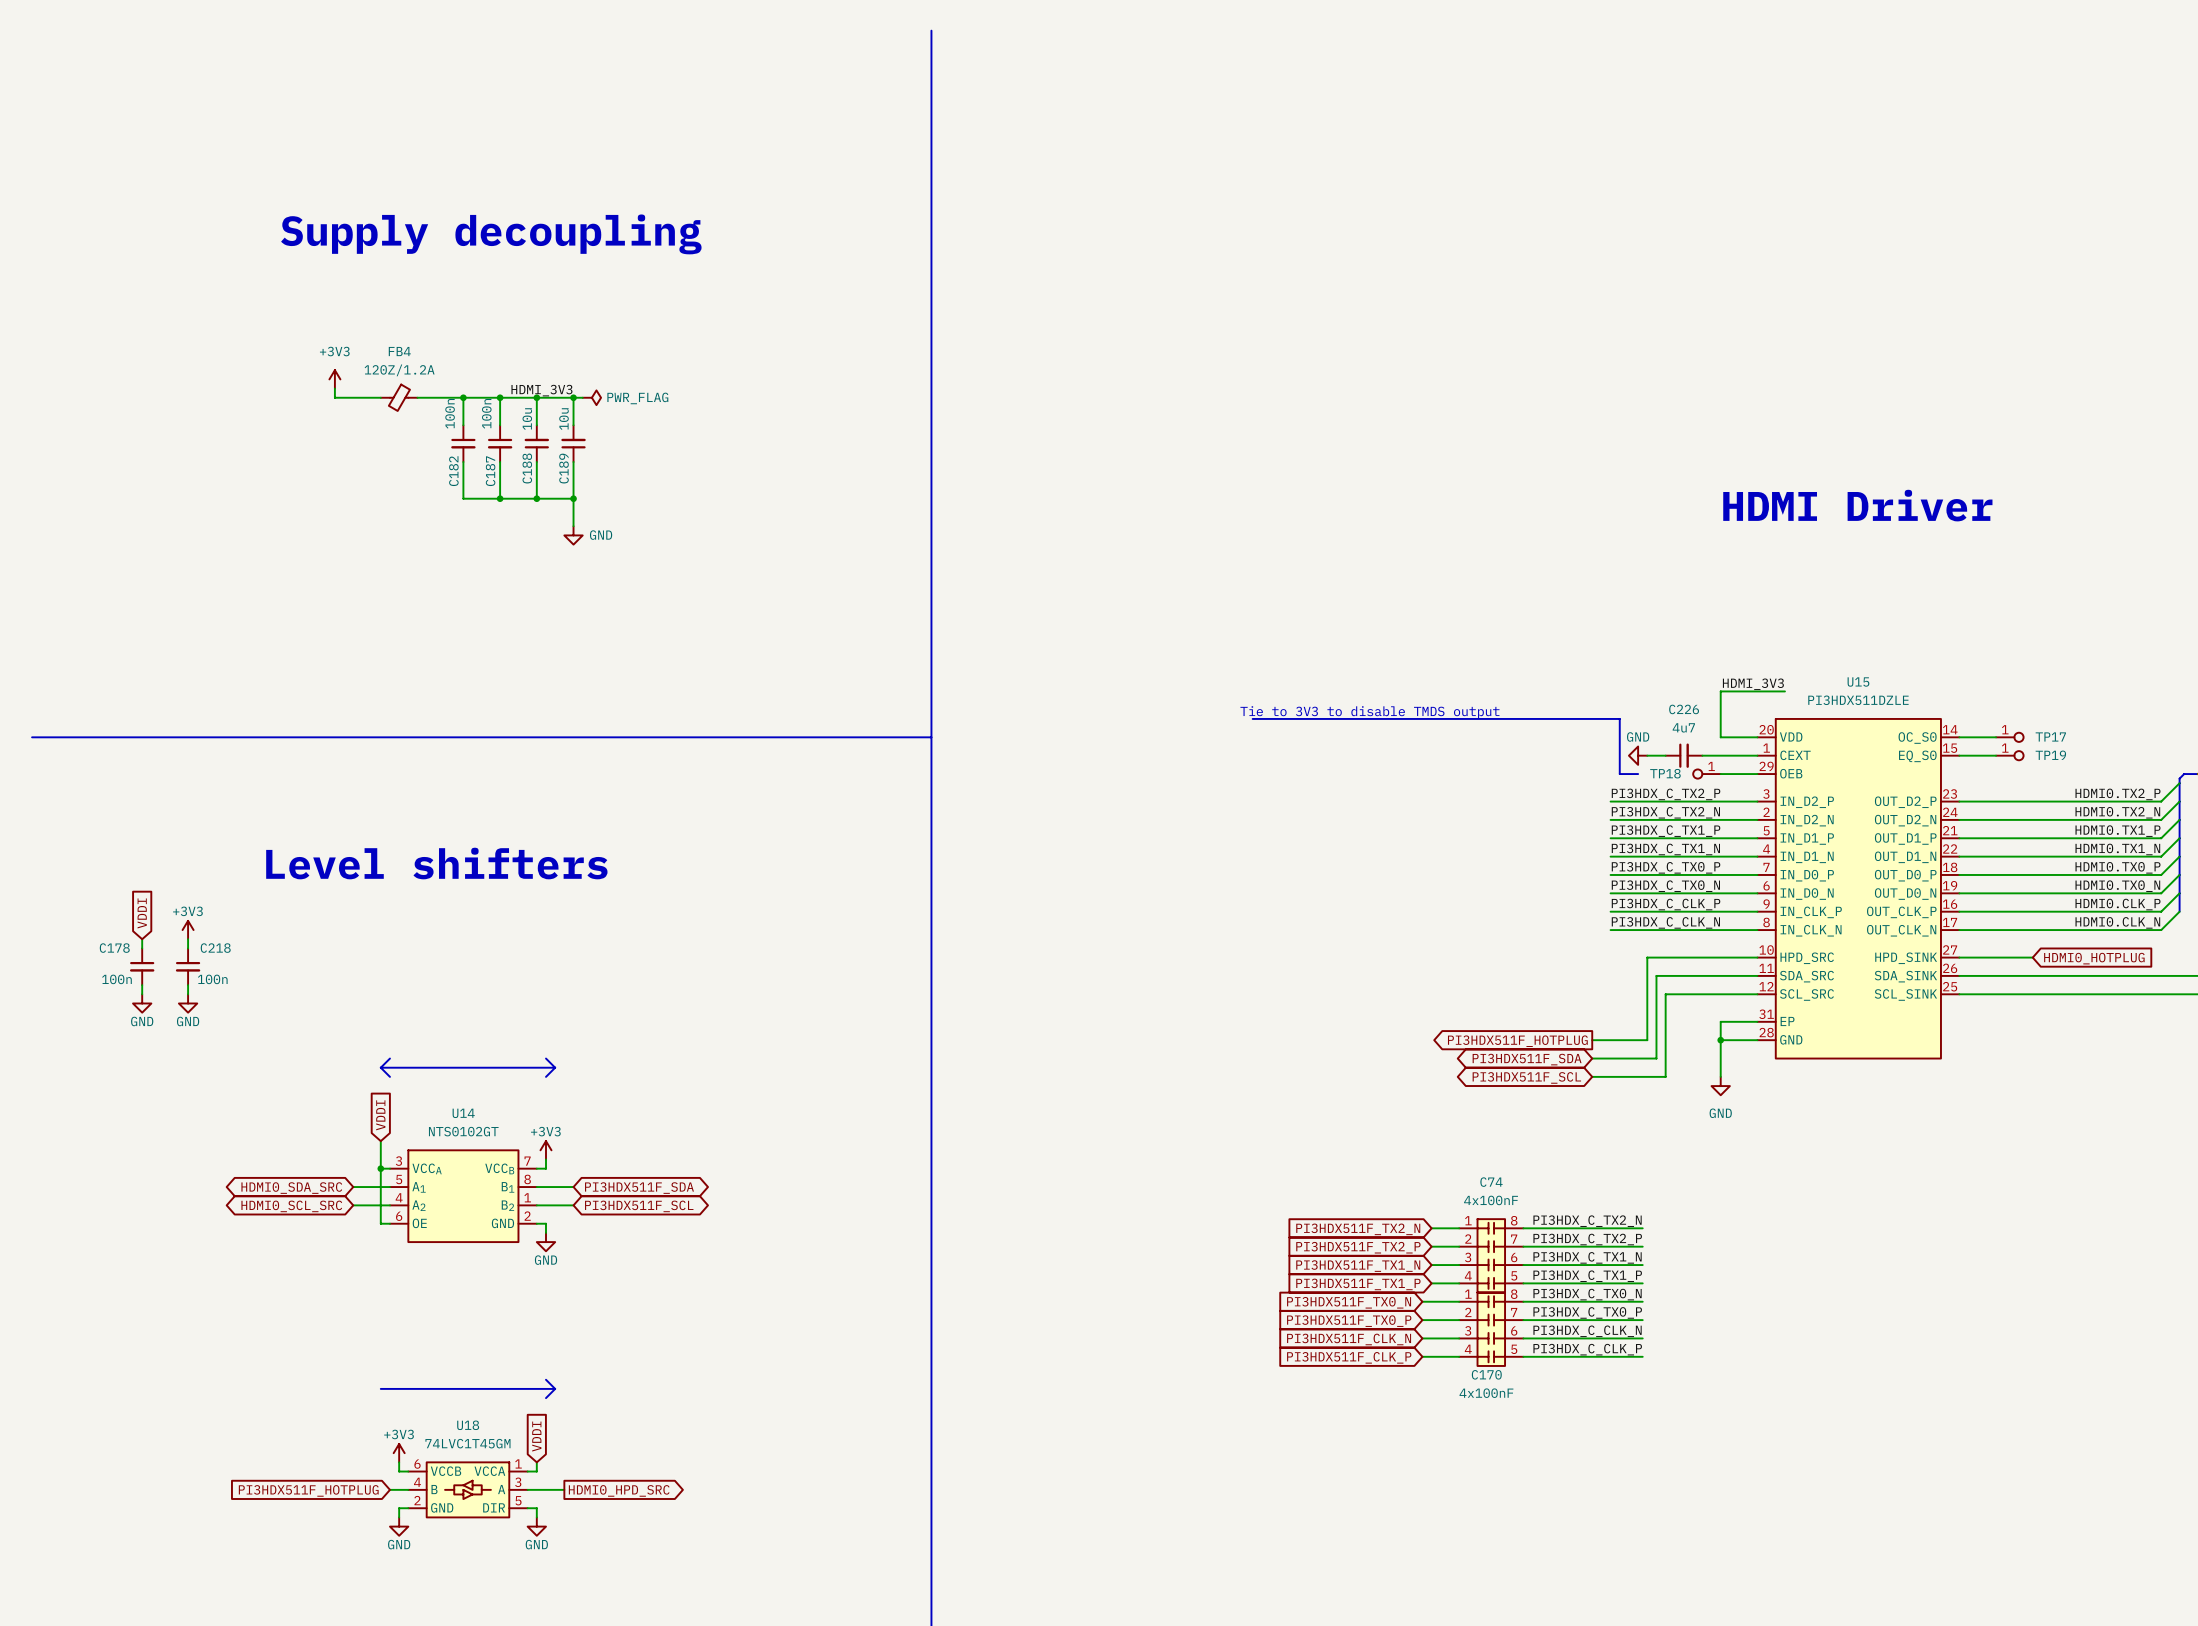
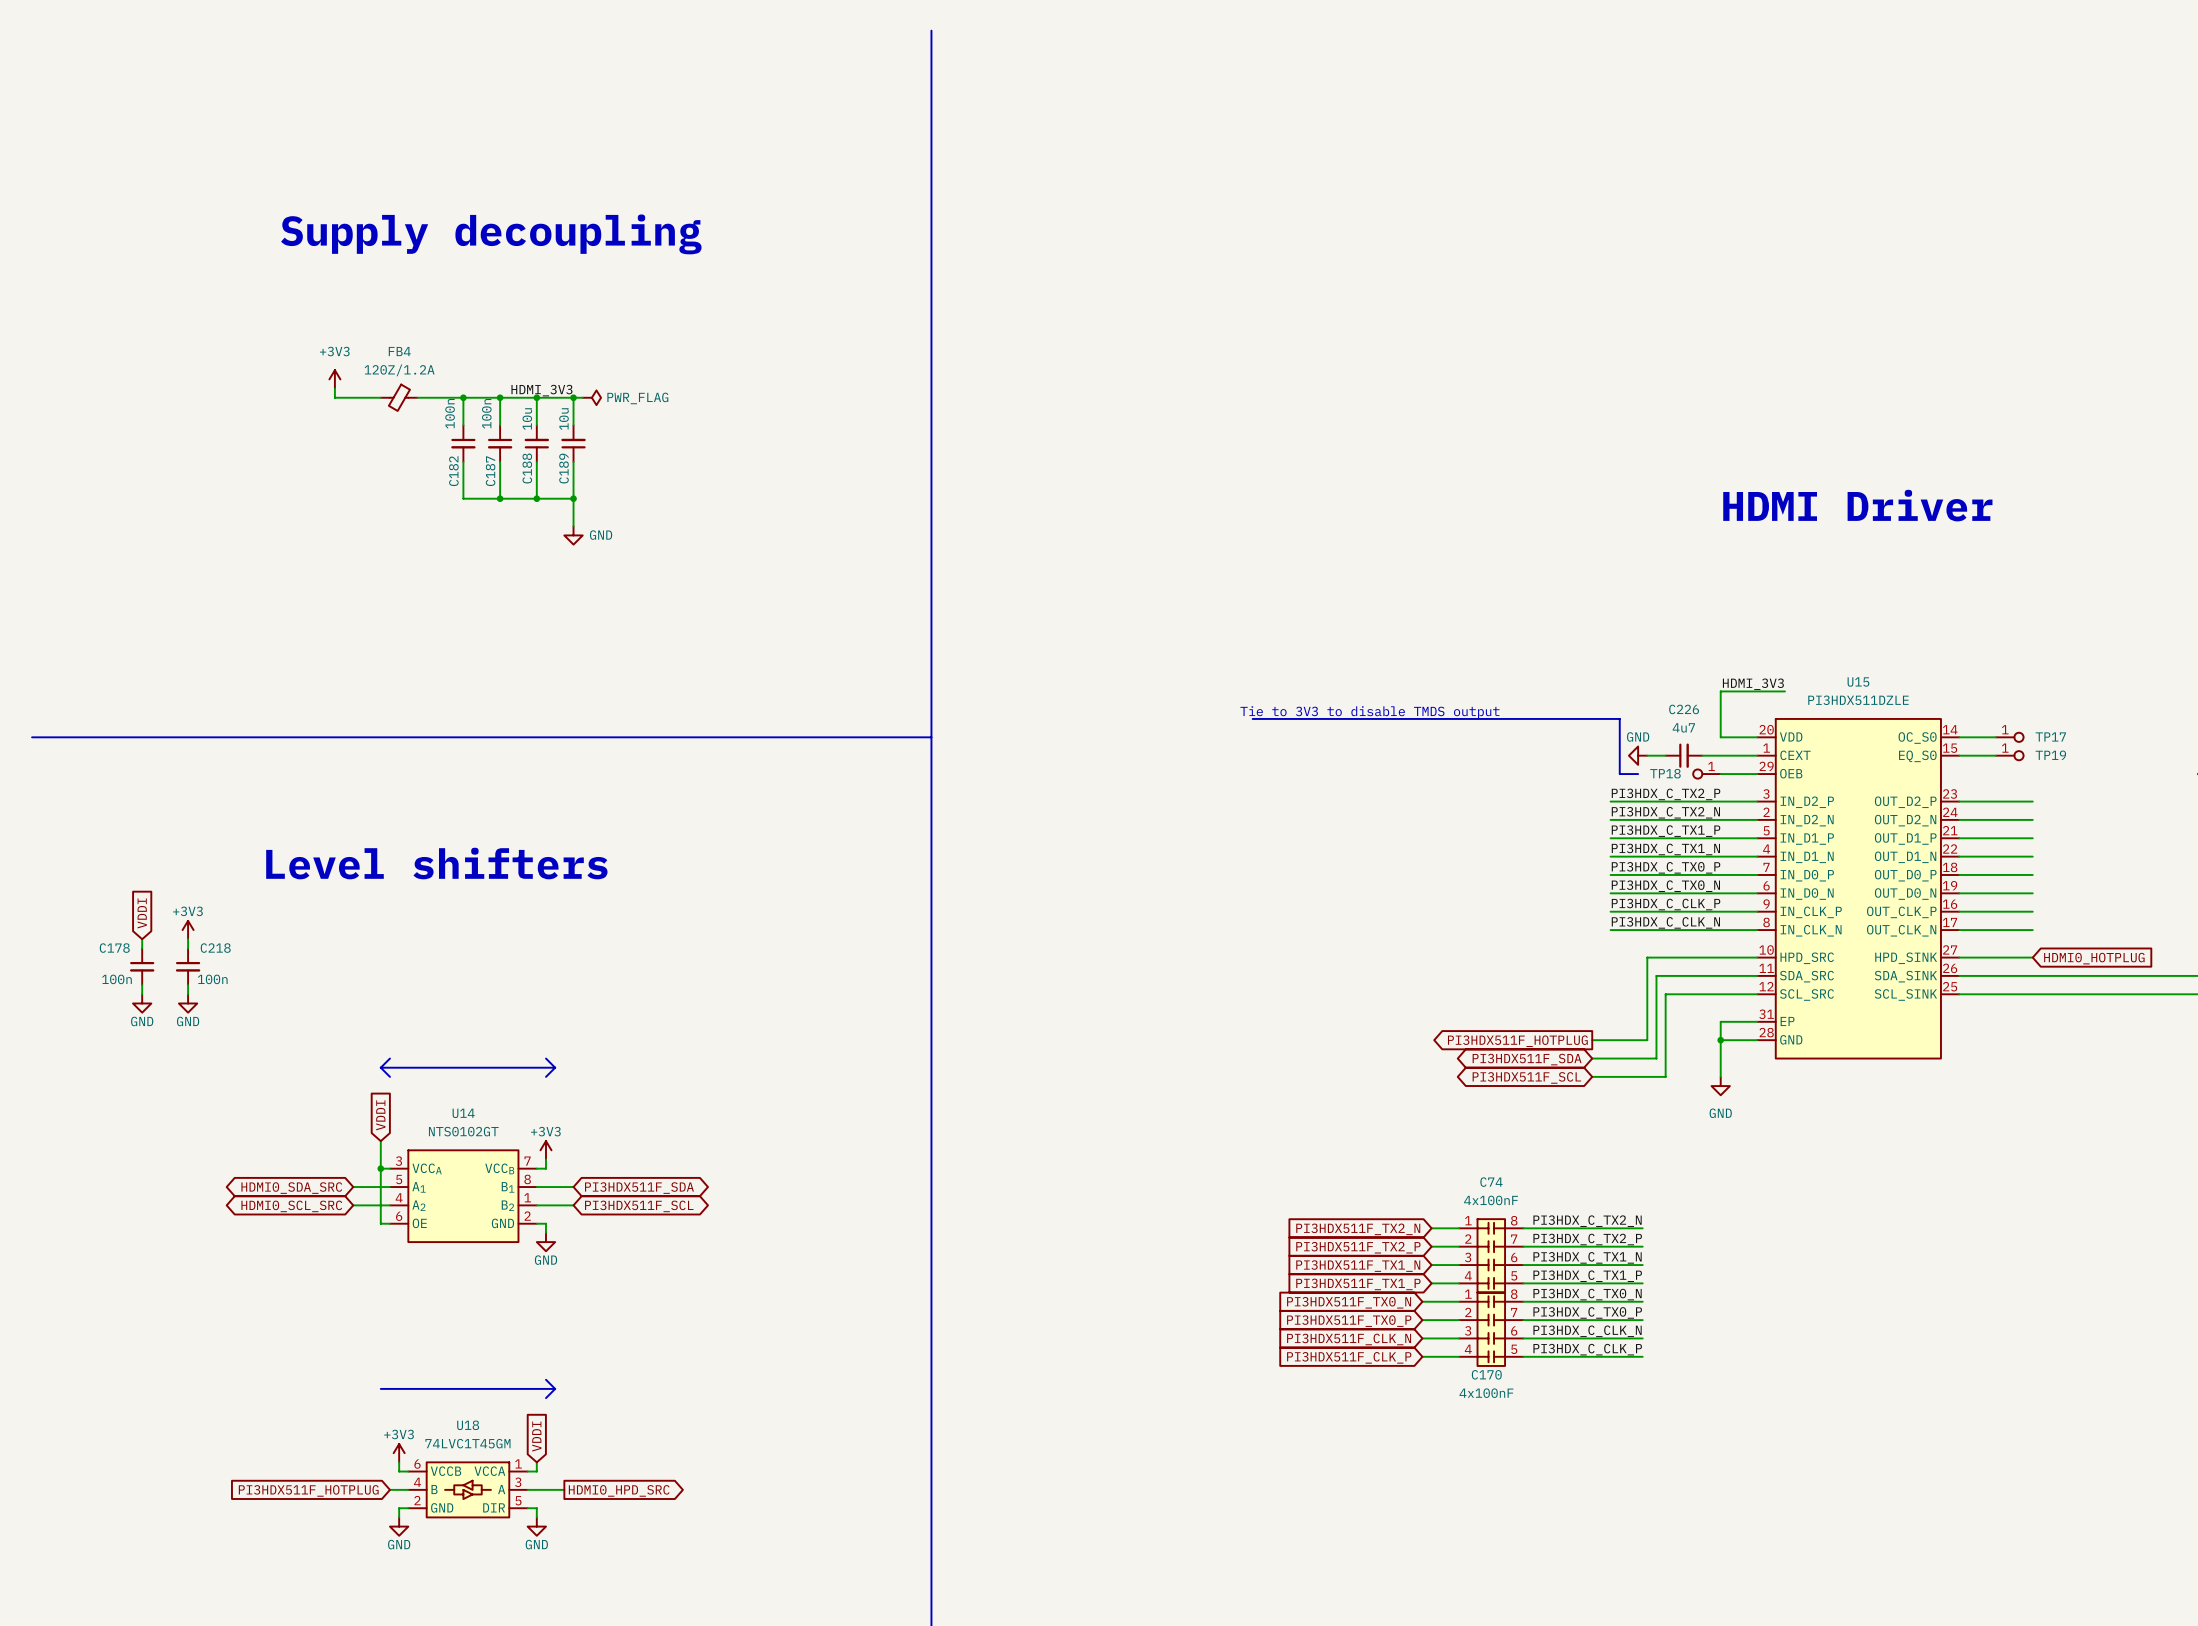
bus: (2197, 774) (2184, 774) (2179, 778) (2179, 911) -> none
wire: (2179, 783) (2161, 801) (2032, 801) -> none
label: HDMI0.TX2_P (2117, 794) -> none
wire: (2179, 801) (2161, 819) (2032, 819) -> none
label: HDMI0.TX2_N (2117, 812) -> none
wire: (2179, 819) (2161, 838) (2032, 838) -> none
label: HDMI0.TX1_P (2117, 831) -> none
wire: (2179, 838) (2161, 856) (2032, 856) -> none
label: HDMI0.TX1_N (2117, 849) -> none
wire: (2179, 856) (2161, 874) (2032, 874) -> none
label: HDMI0.TX0_P (2117, 867) -> none
wire: (2179, 874) (2161, 893) (2032, 893) -> none
label: HDMI0.TX0_N (2117, 886) -> none
wire: (2179, 893) (2161, 911) (2032, 911) -> none
label: HDMI0.CLK_P (2117, 904) -> none
wire: (2179, 911) (2161, 930) (2032, 930) -> none
label: HDMI0.CLK_N (2117, 922) -> none

